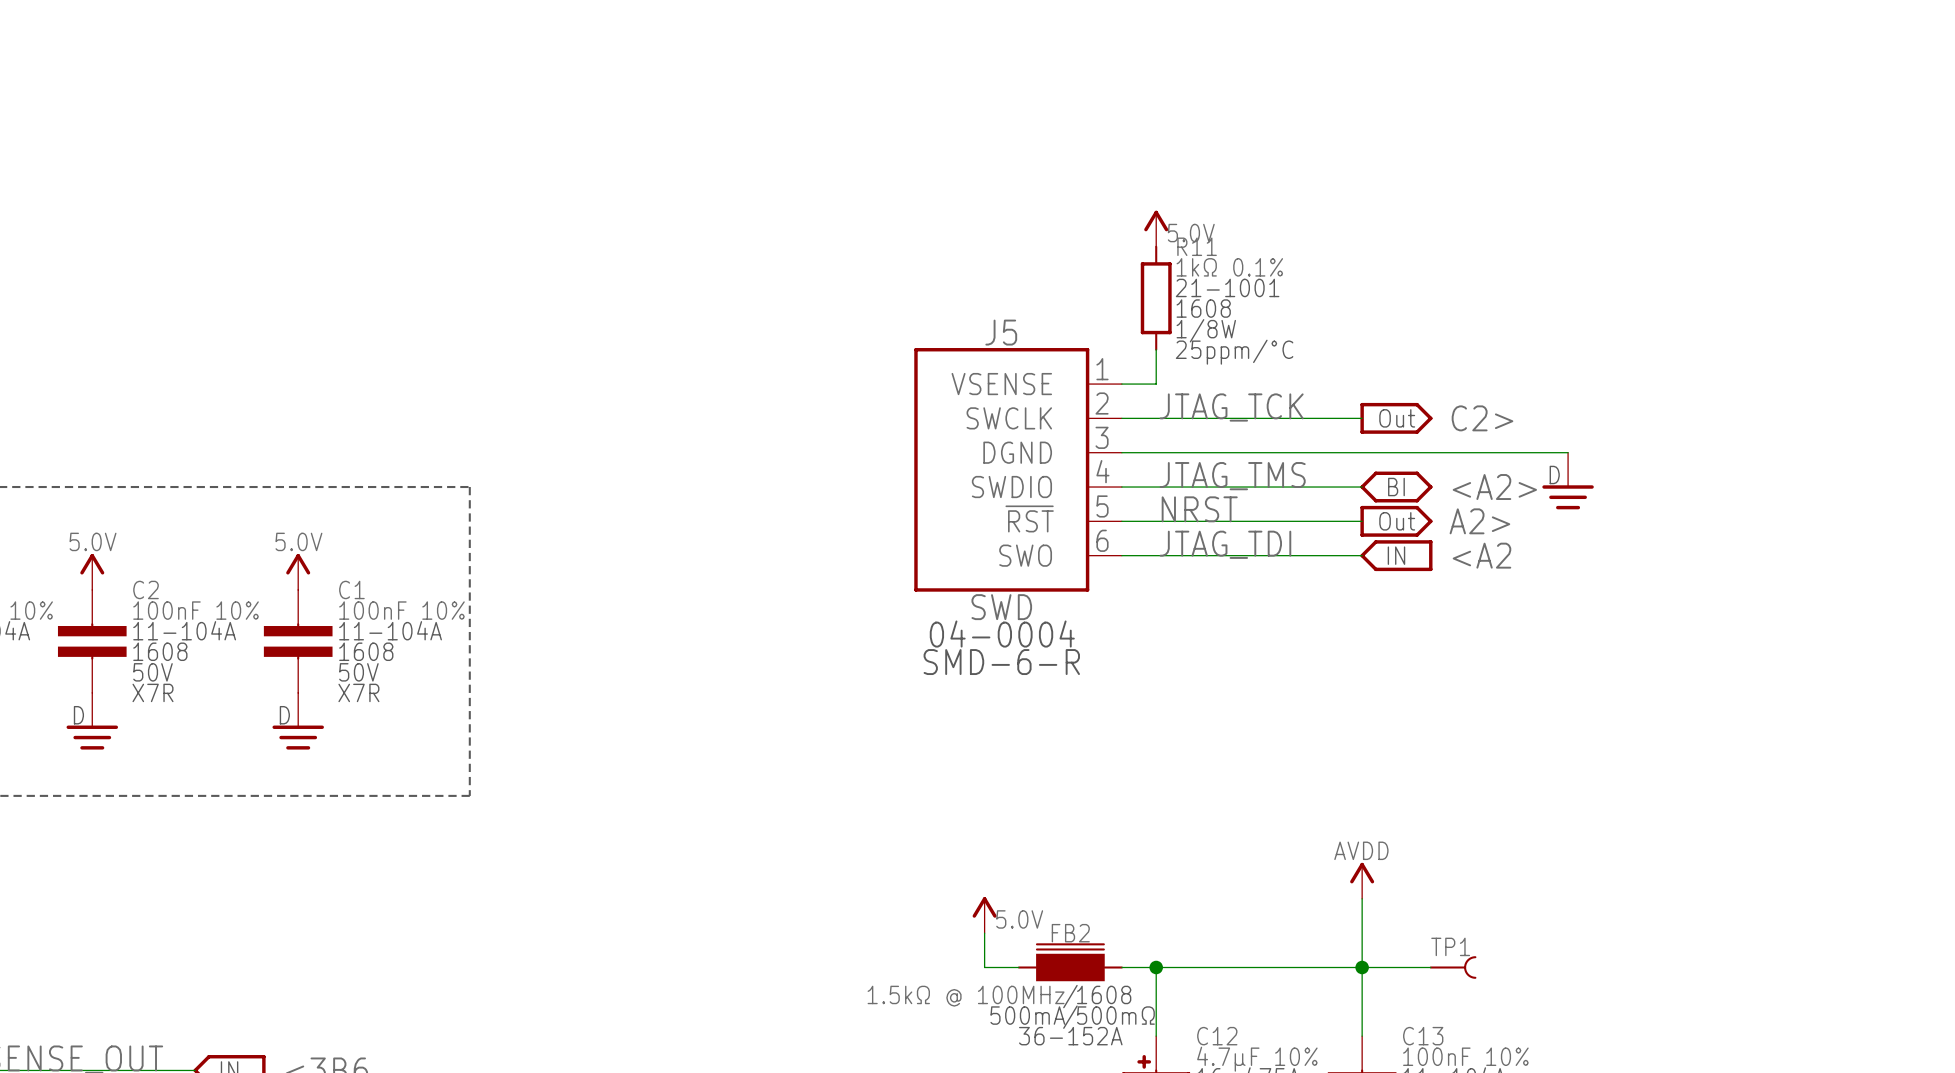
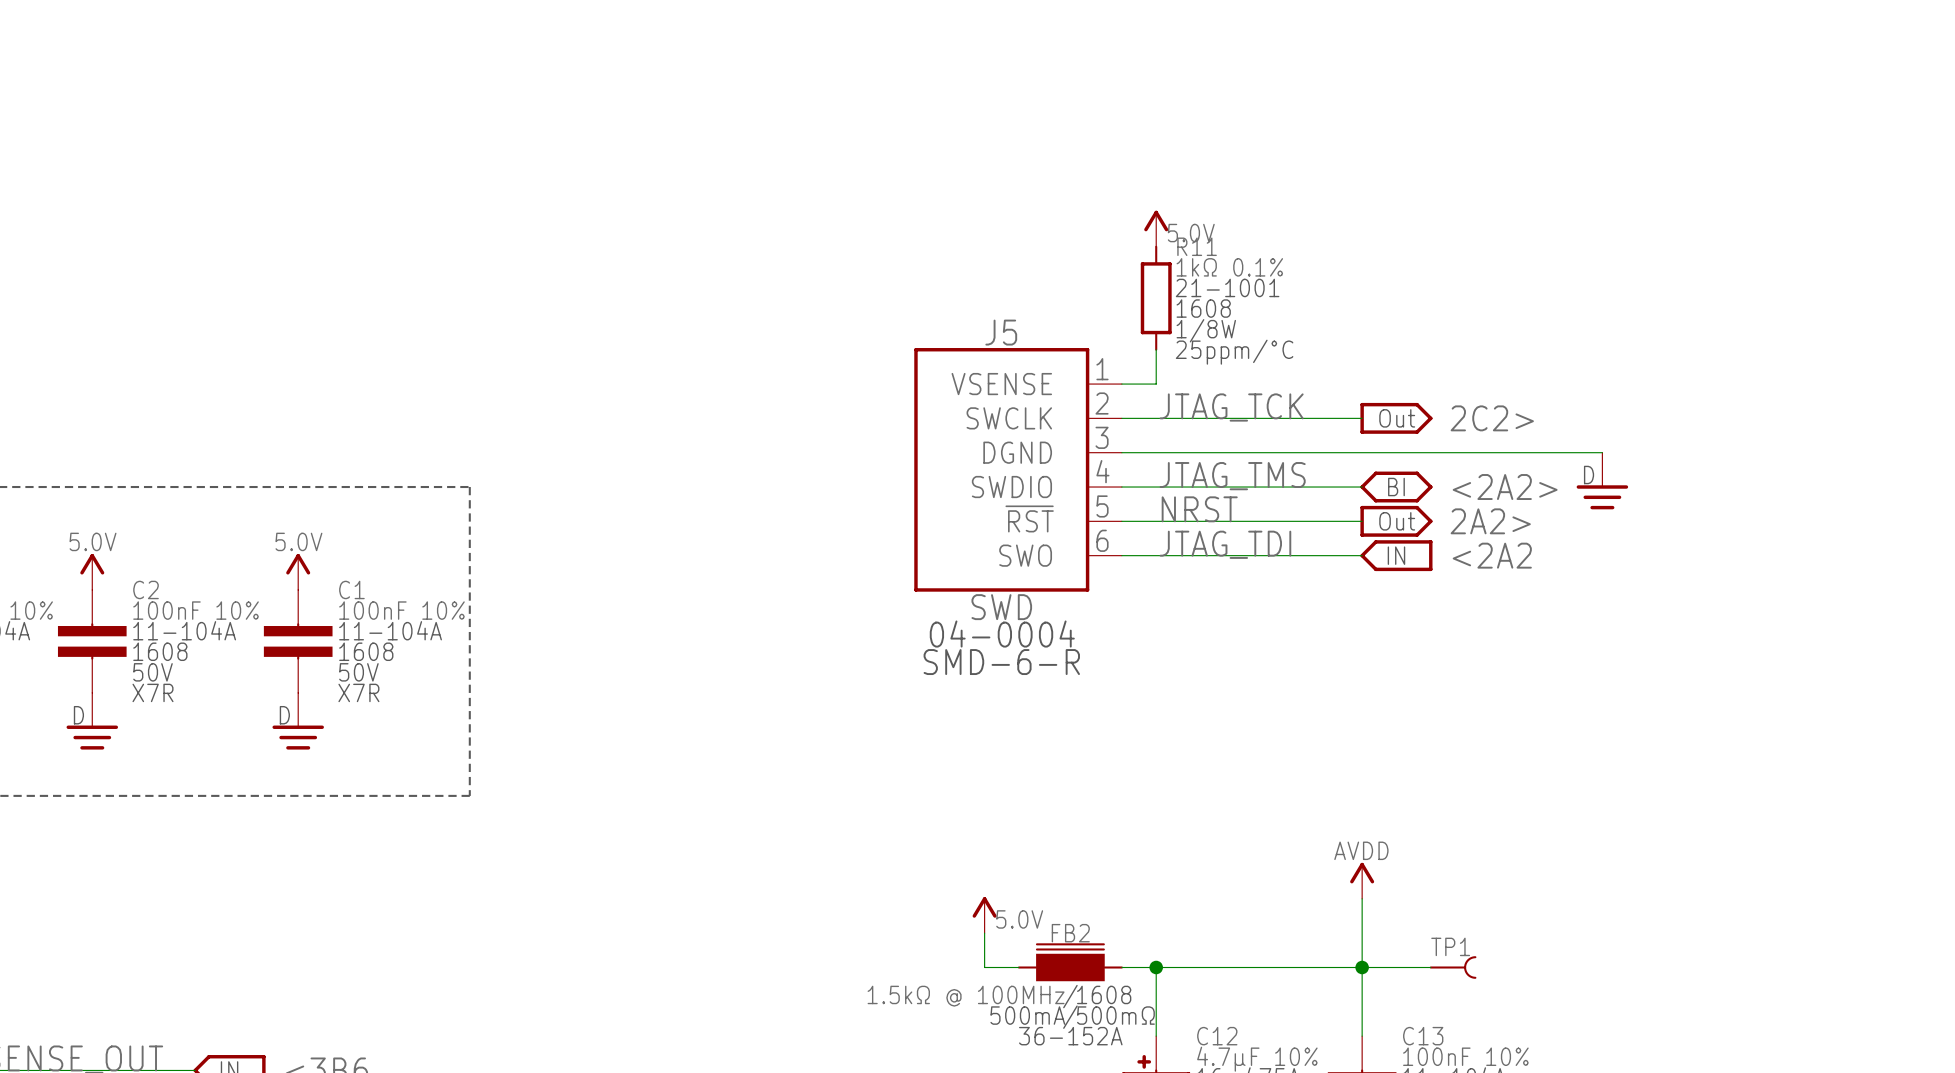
text: C2> (1482, 418) -> 2C2> (1492, 418)
wire: none -> (1568, 452) (1602, 452)
power symbol position: (1568, 481) -> (1602, 481)
text: <A2> (1494, 487) -> <2A2> (1505, 487)
text: A2> (1479, 521) -> 2A2> (1490, 521)
text: <A2 (1481, 555) -> <2A2 (1492, 555)

